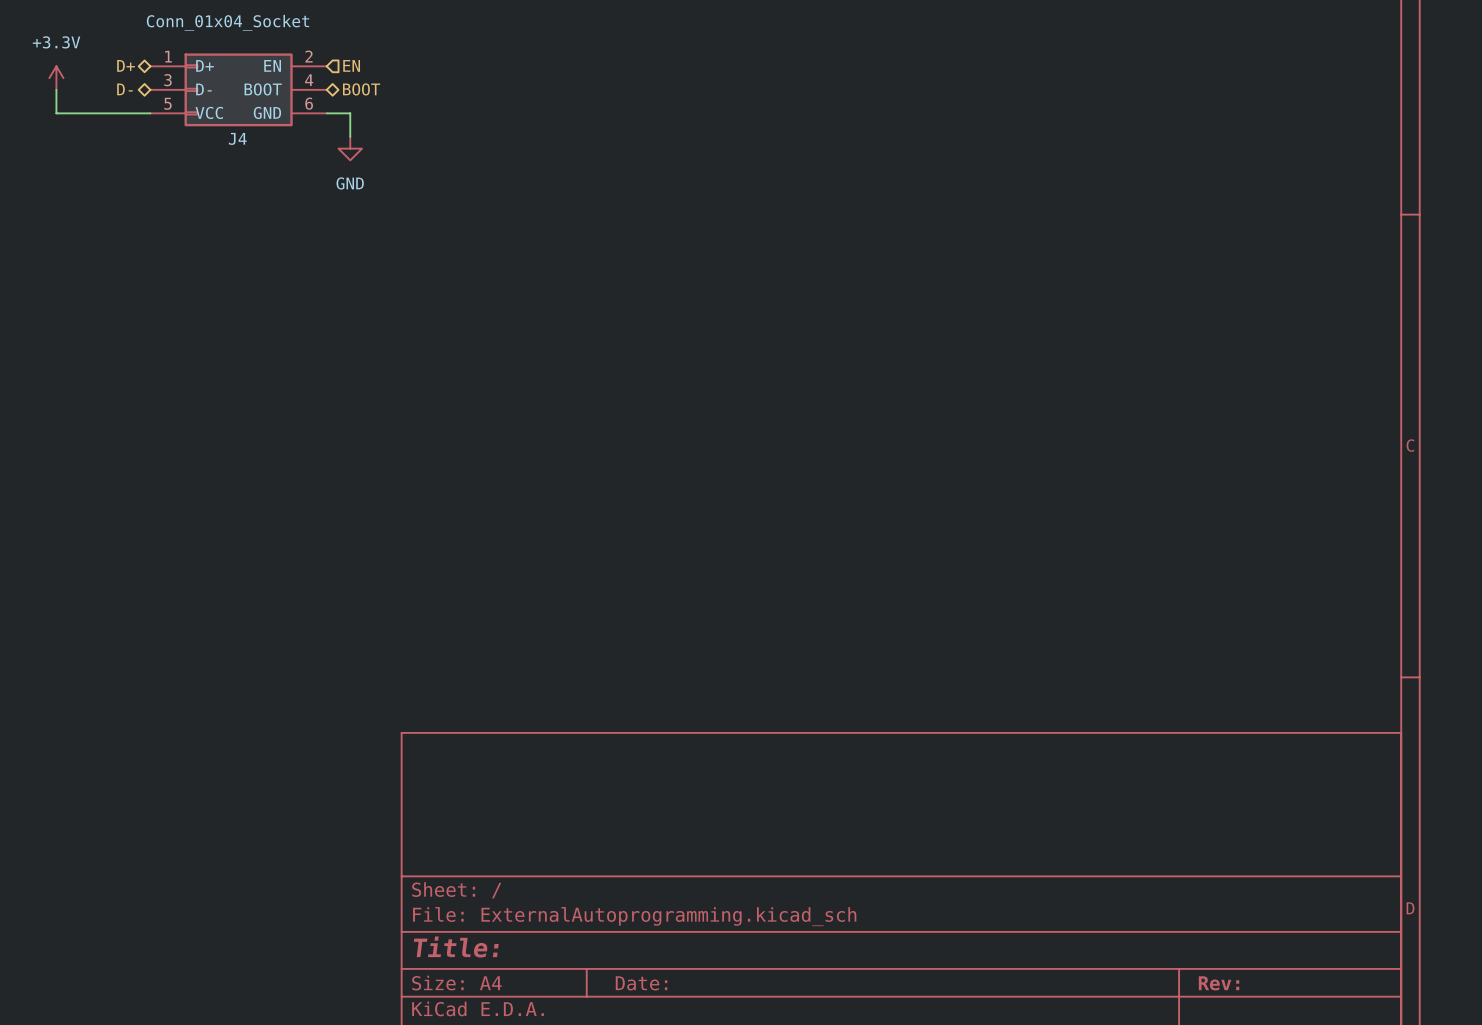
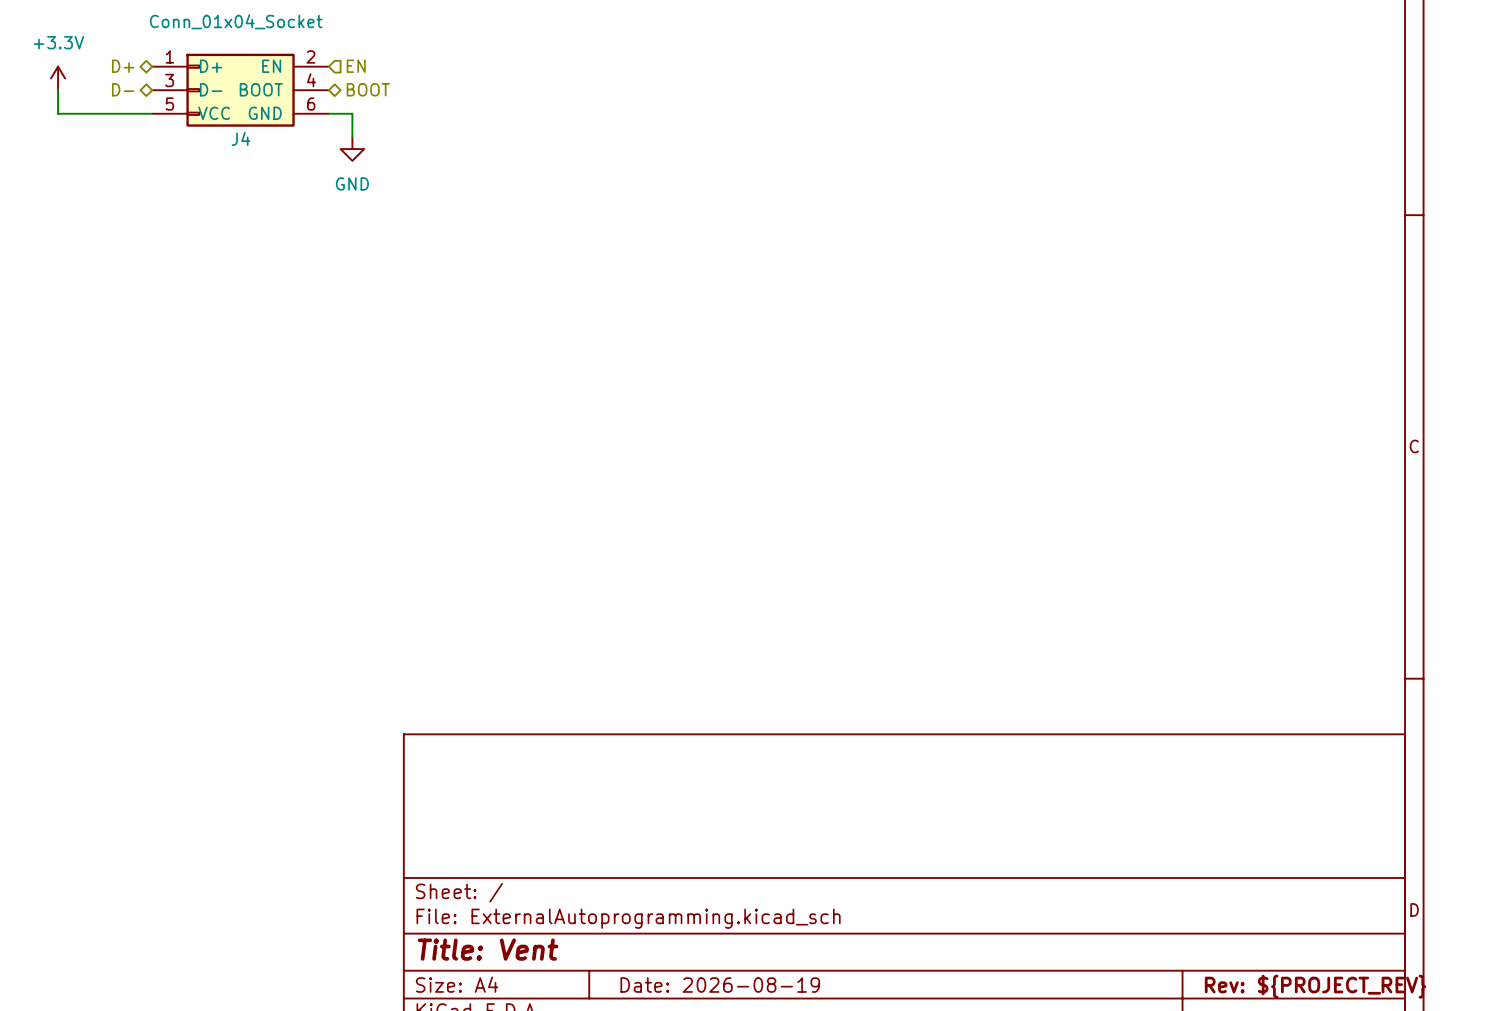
title block: Title: (456, 946) -> Title: Vent (488, 949)
title block: Date: (641, 983) -> Date: 2026-08-19 (720, 985)
title block: Rev: (1219, 983) -> Rev: ${PROJECT_REV} (1315, 986)

